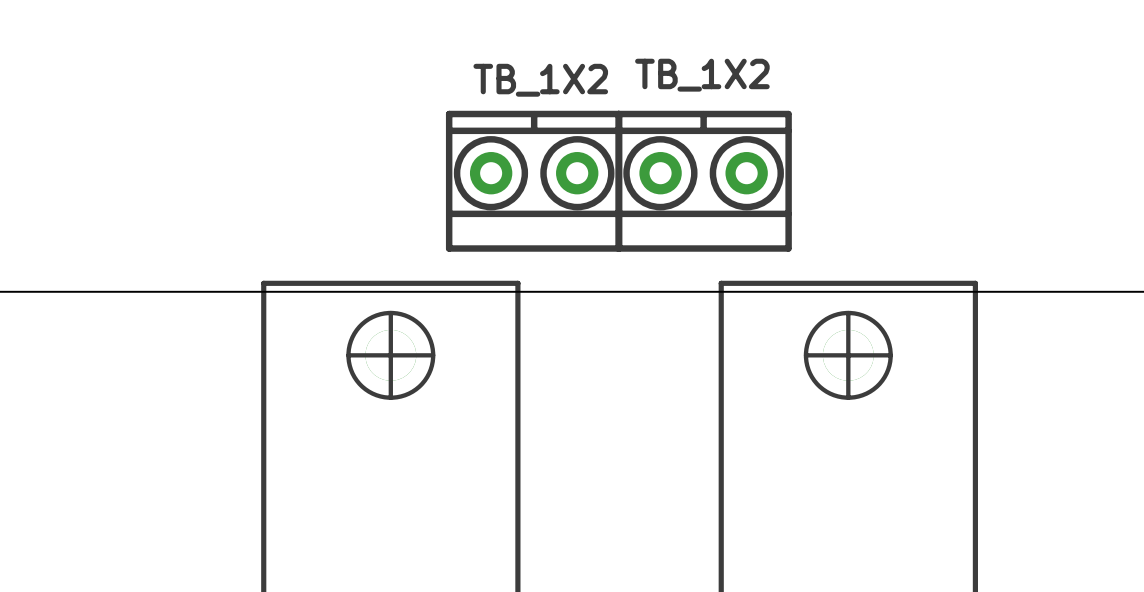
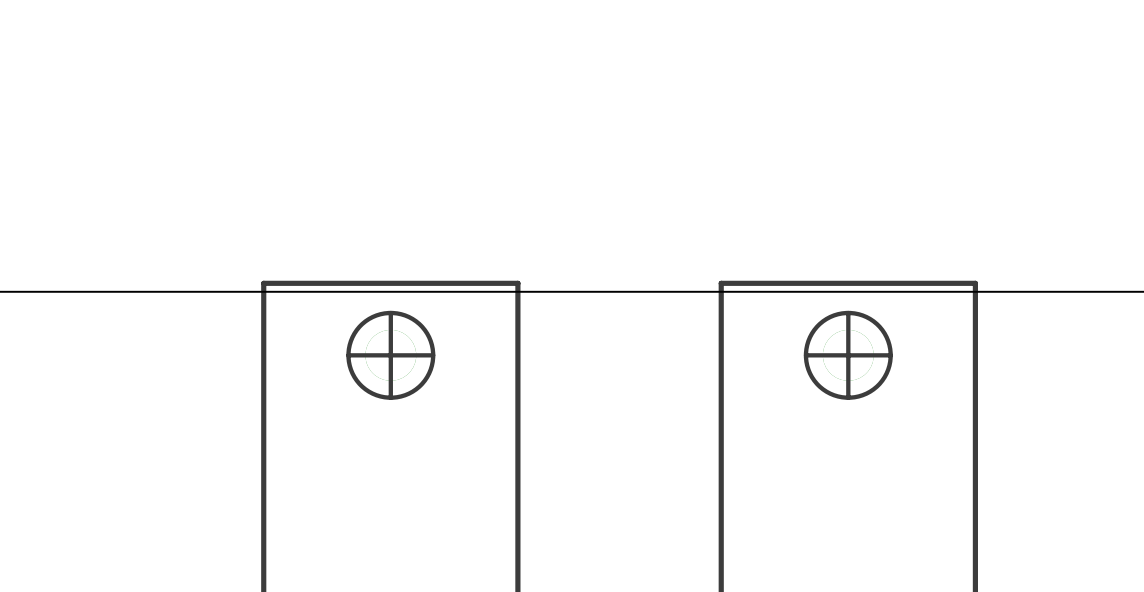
part: TB_1X2 (534, 181) -> none
part: TB_1X2 (703, 181) -> none

